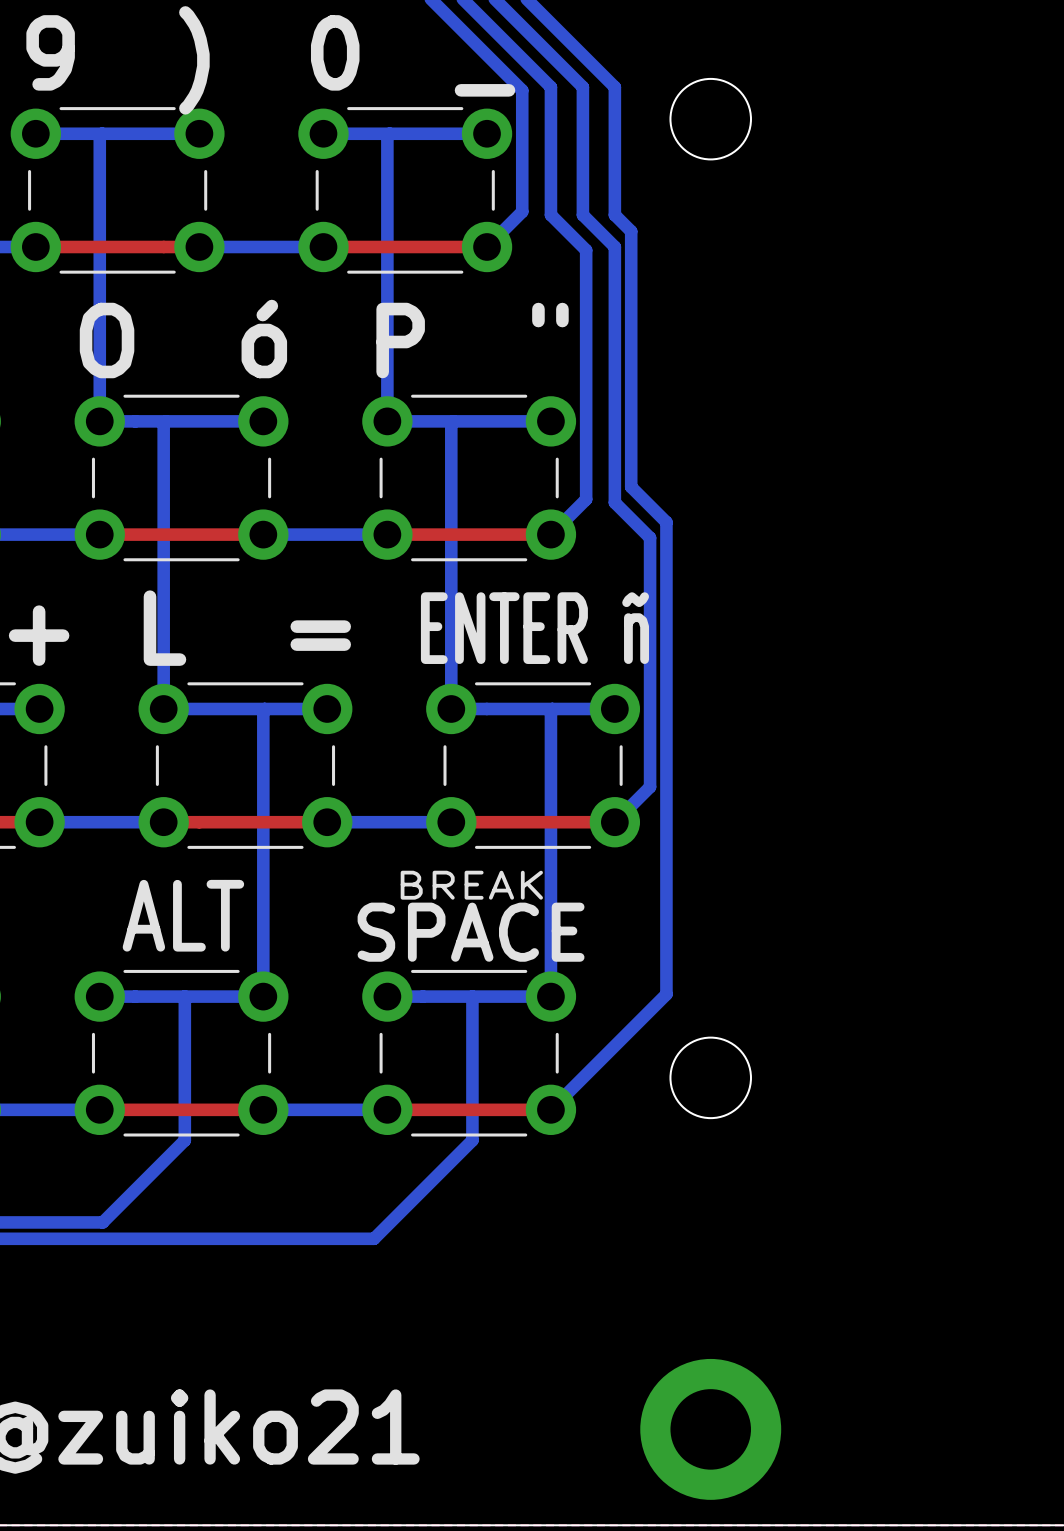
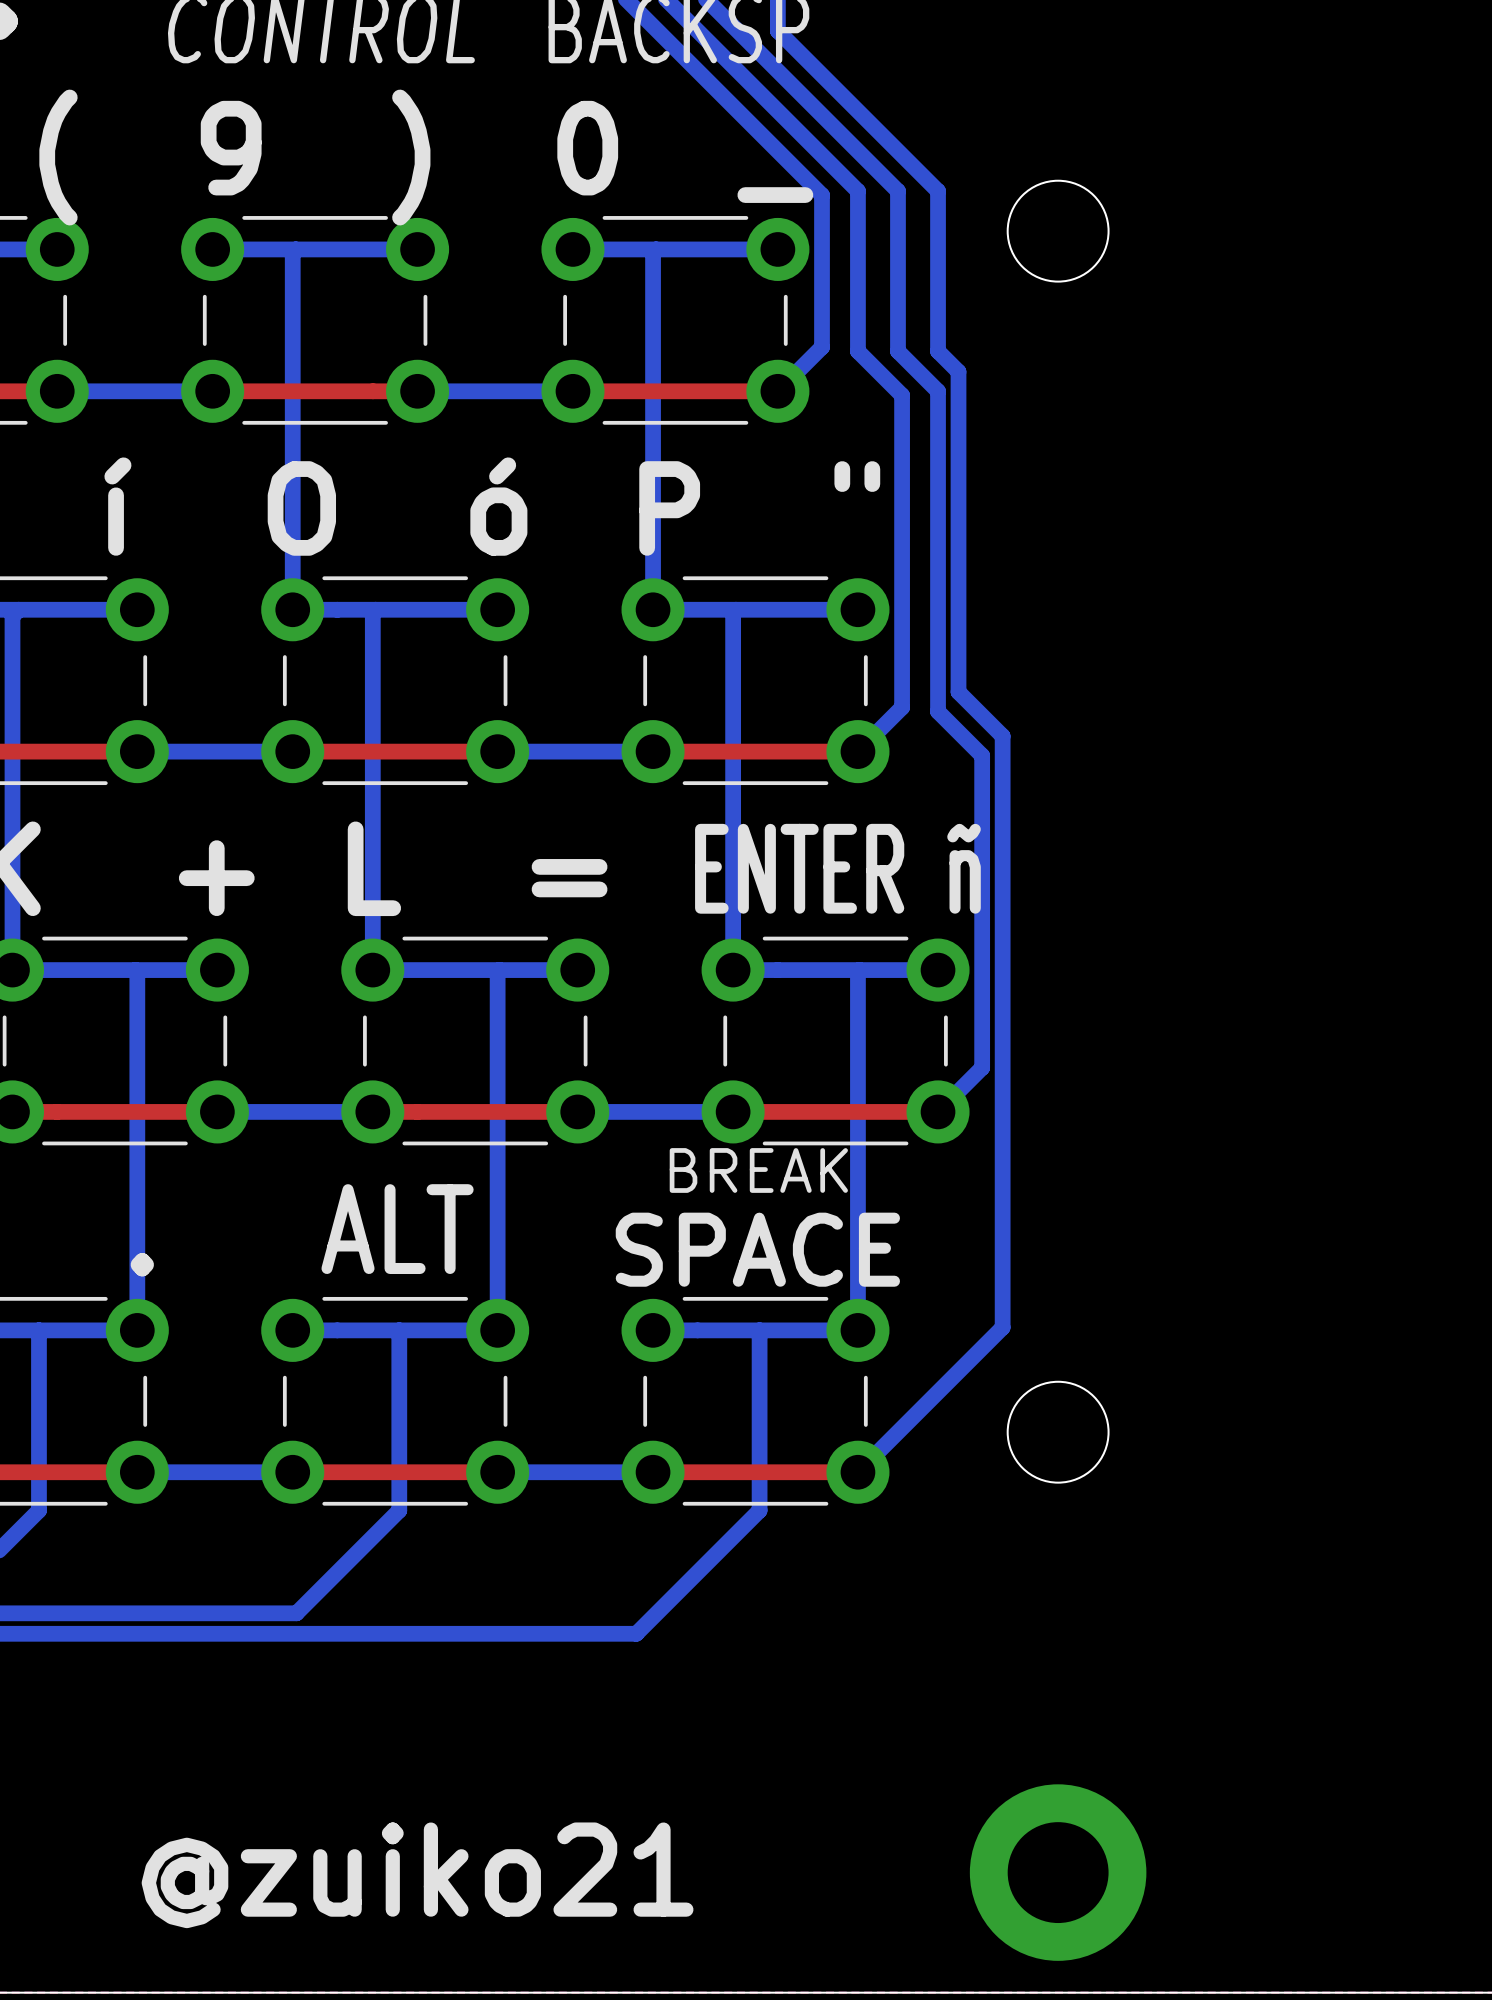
part text position: BREAK (471, 885) -> BREAK (758, 1170)

